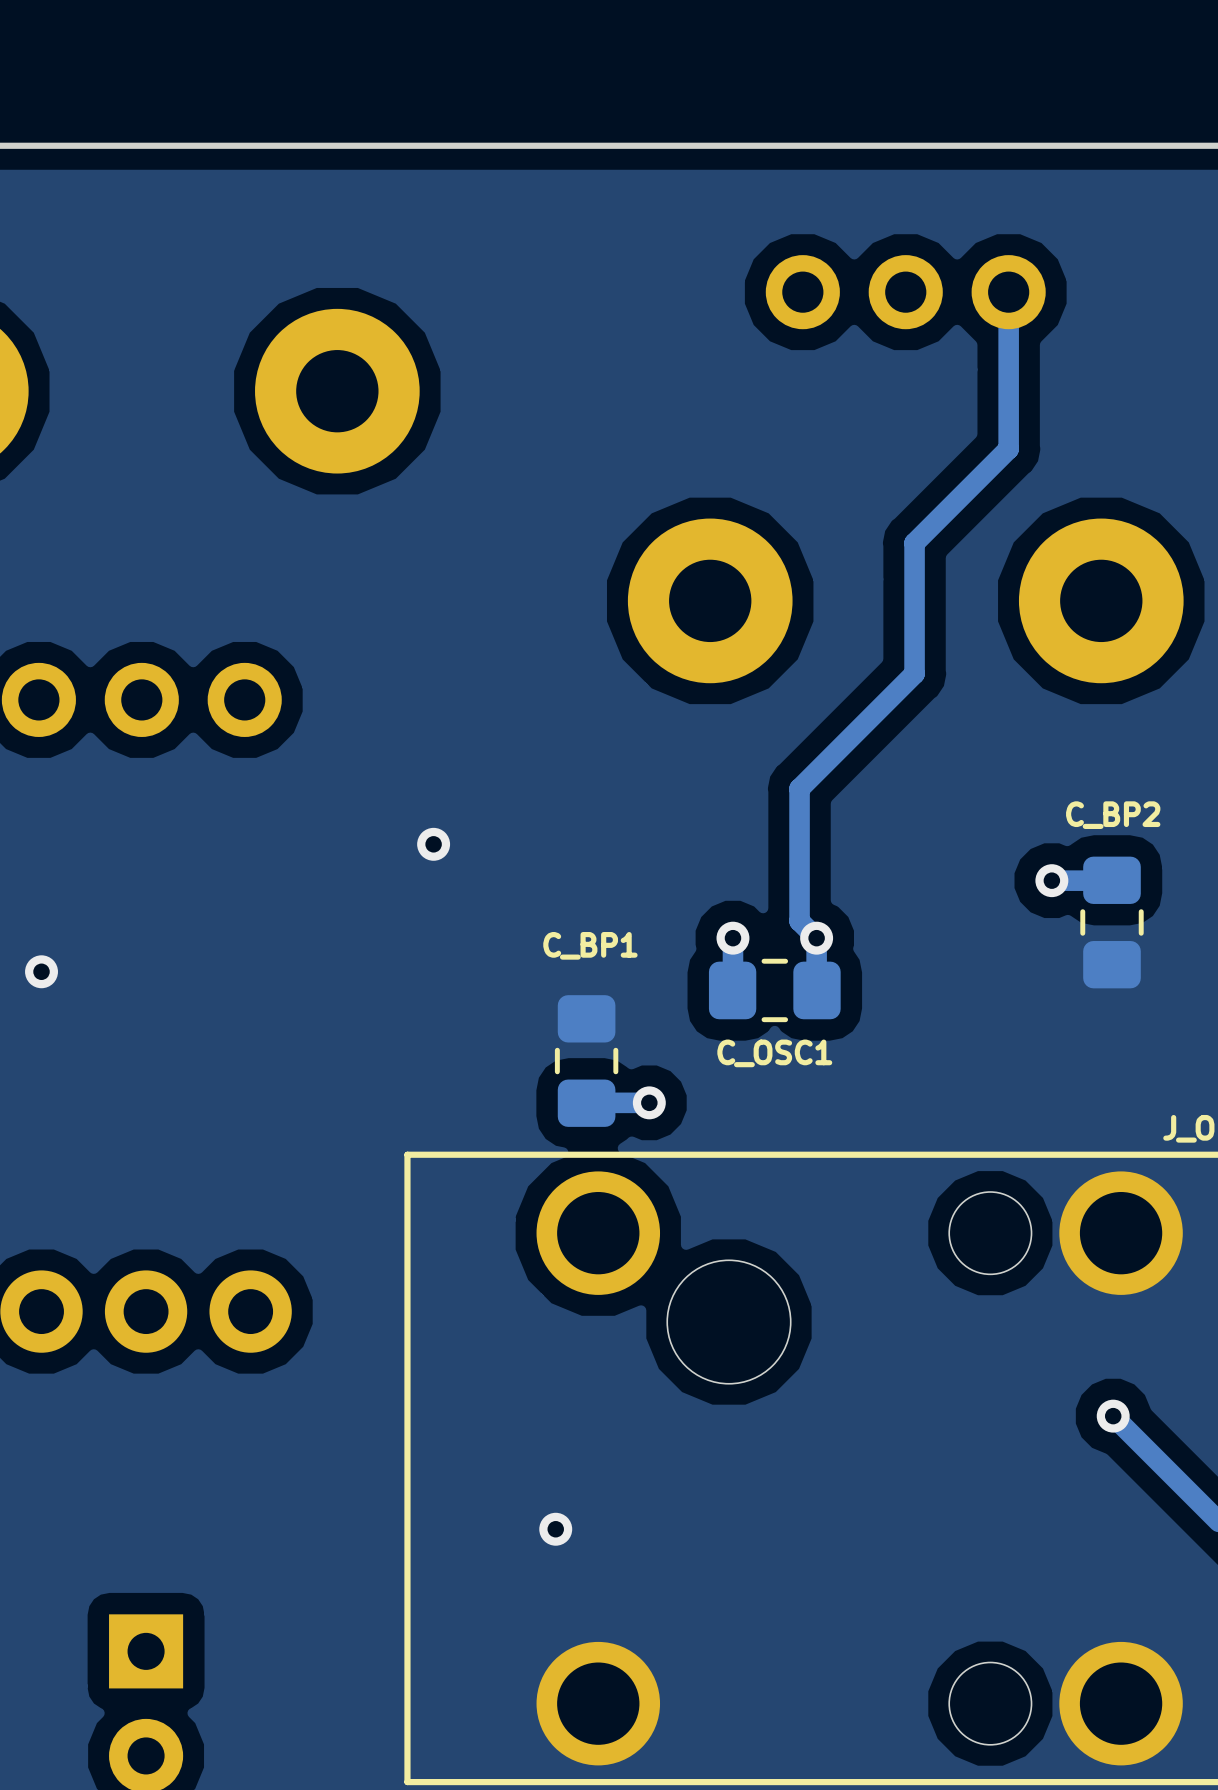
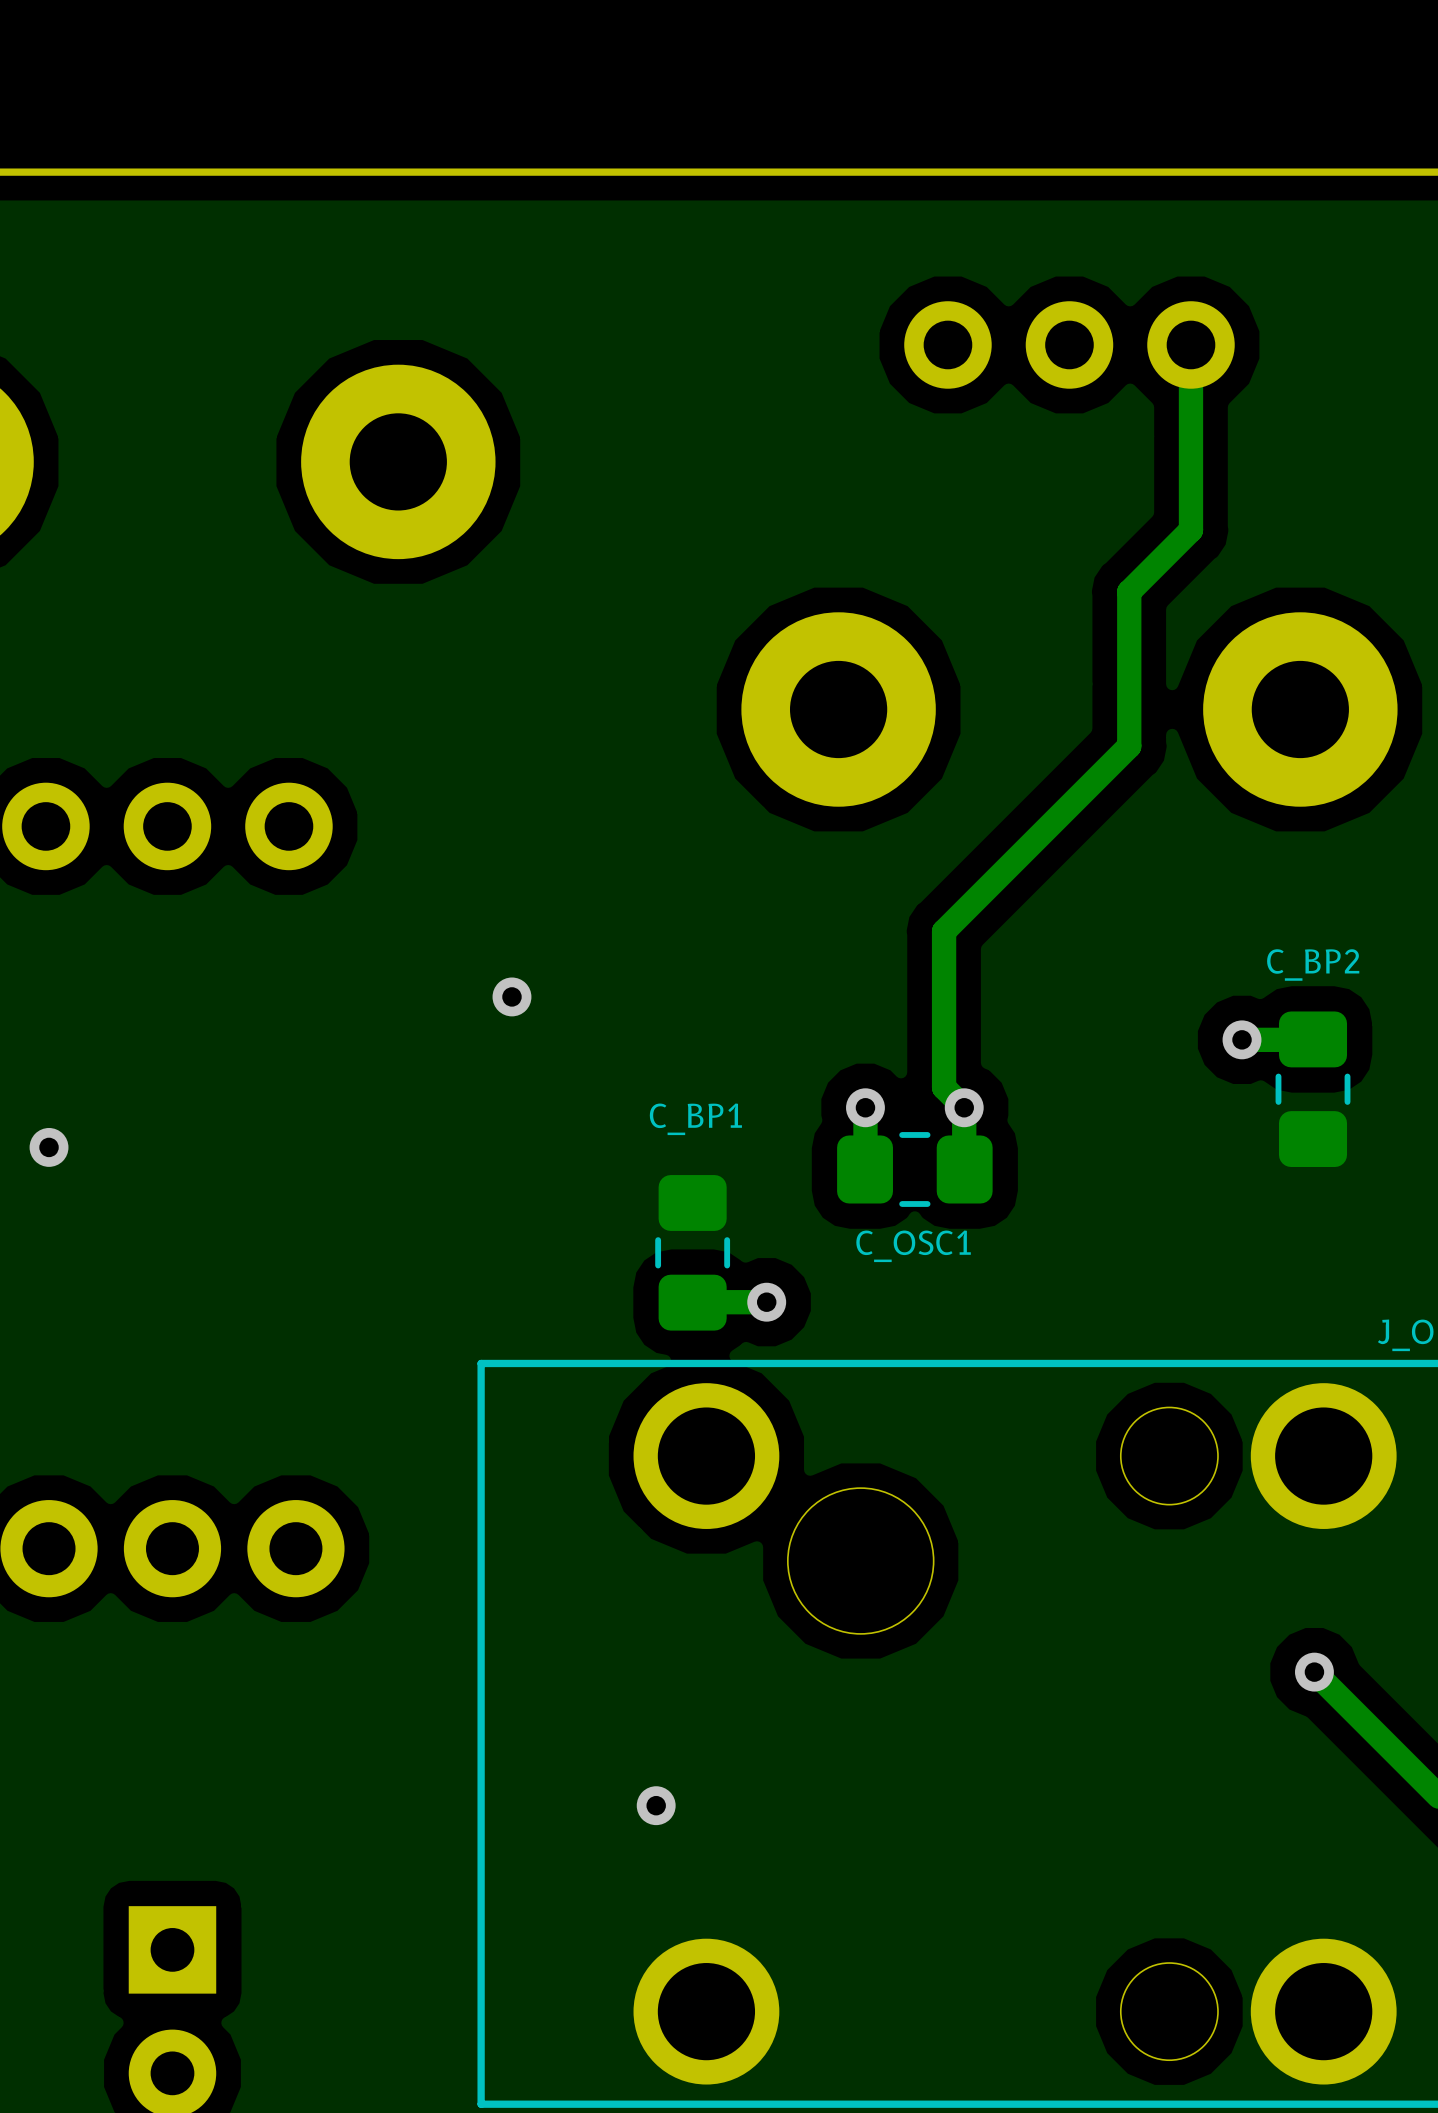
track: (956, 501) (914, 543) (914, 673) -> (1129, 591) (1129, 746) (1079, 795)

